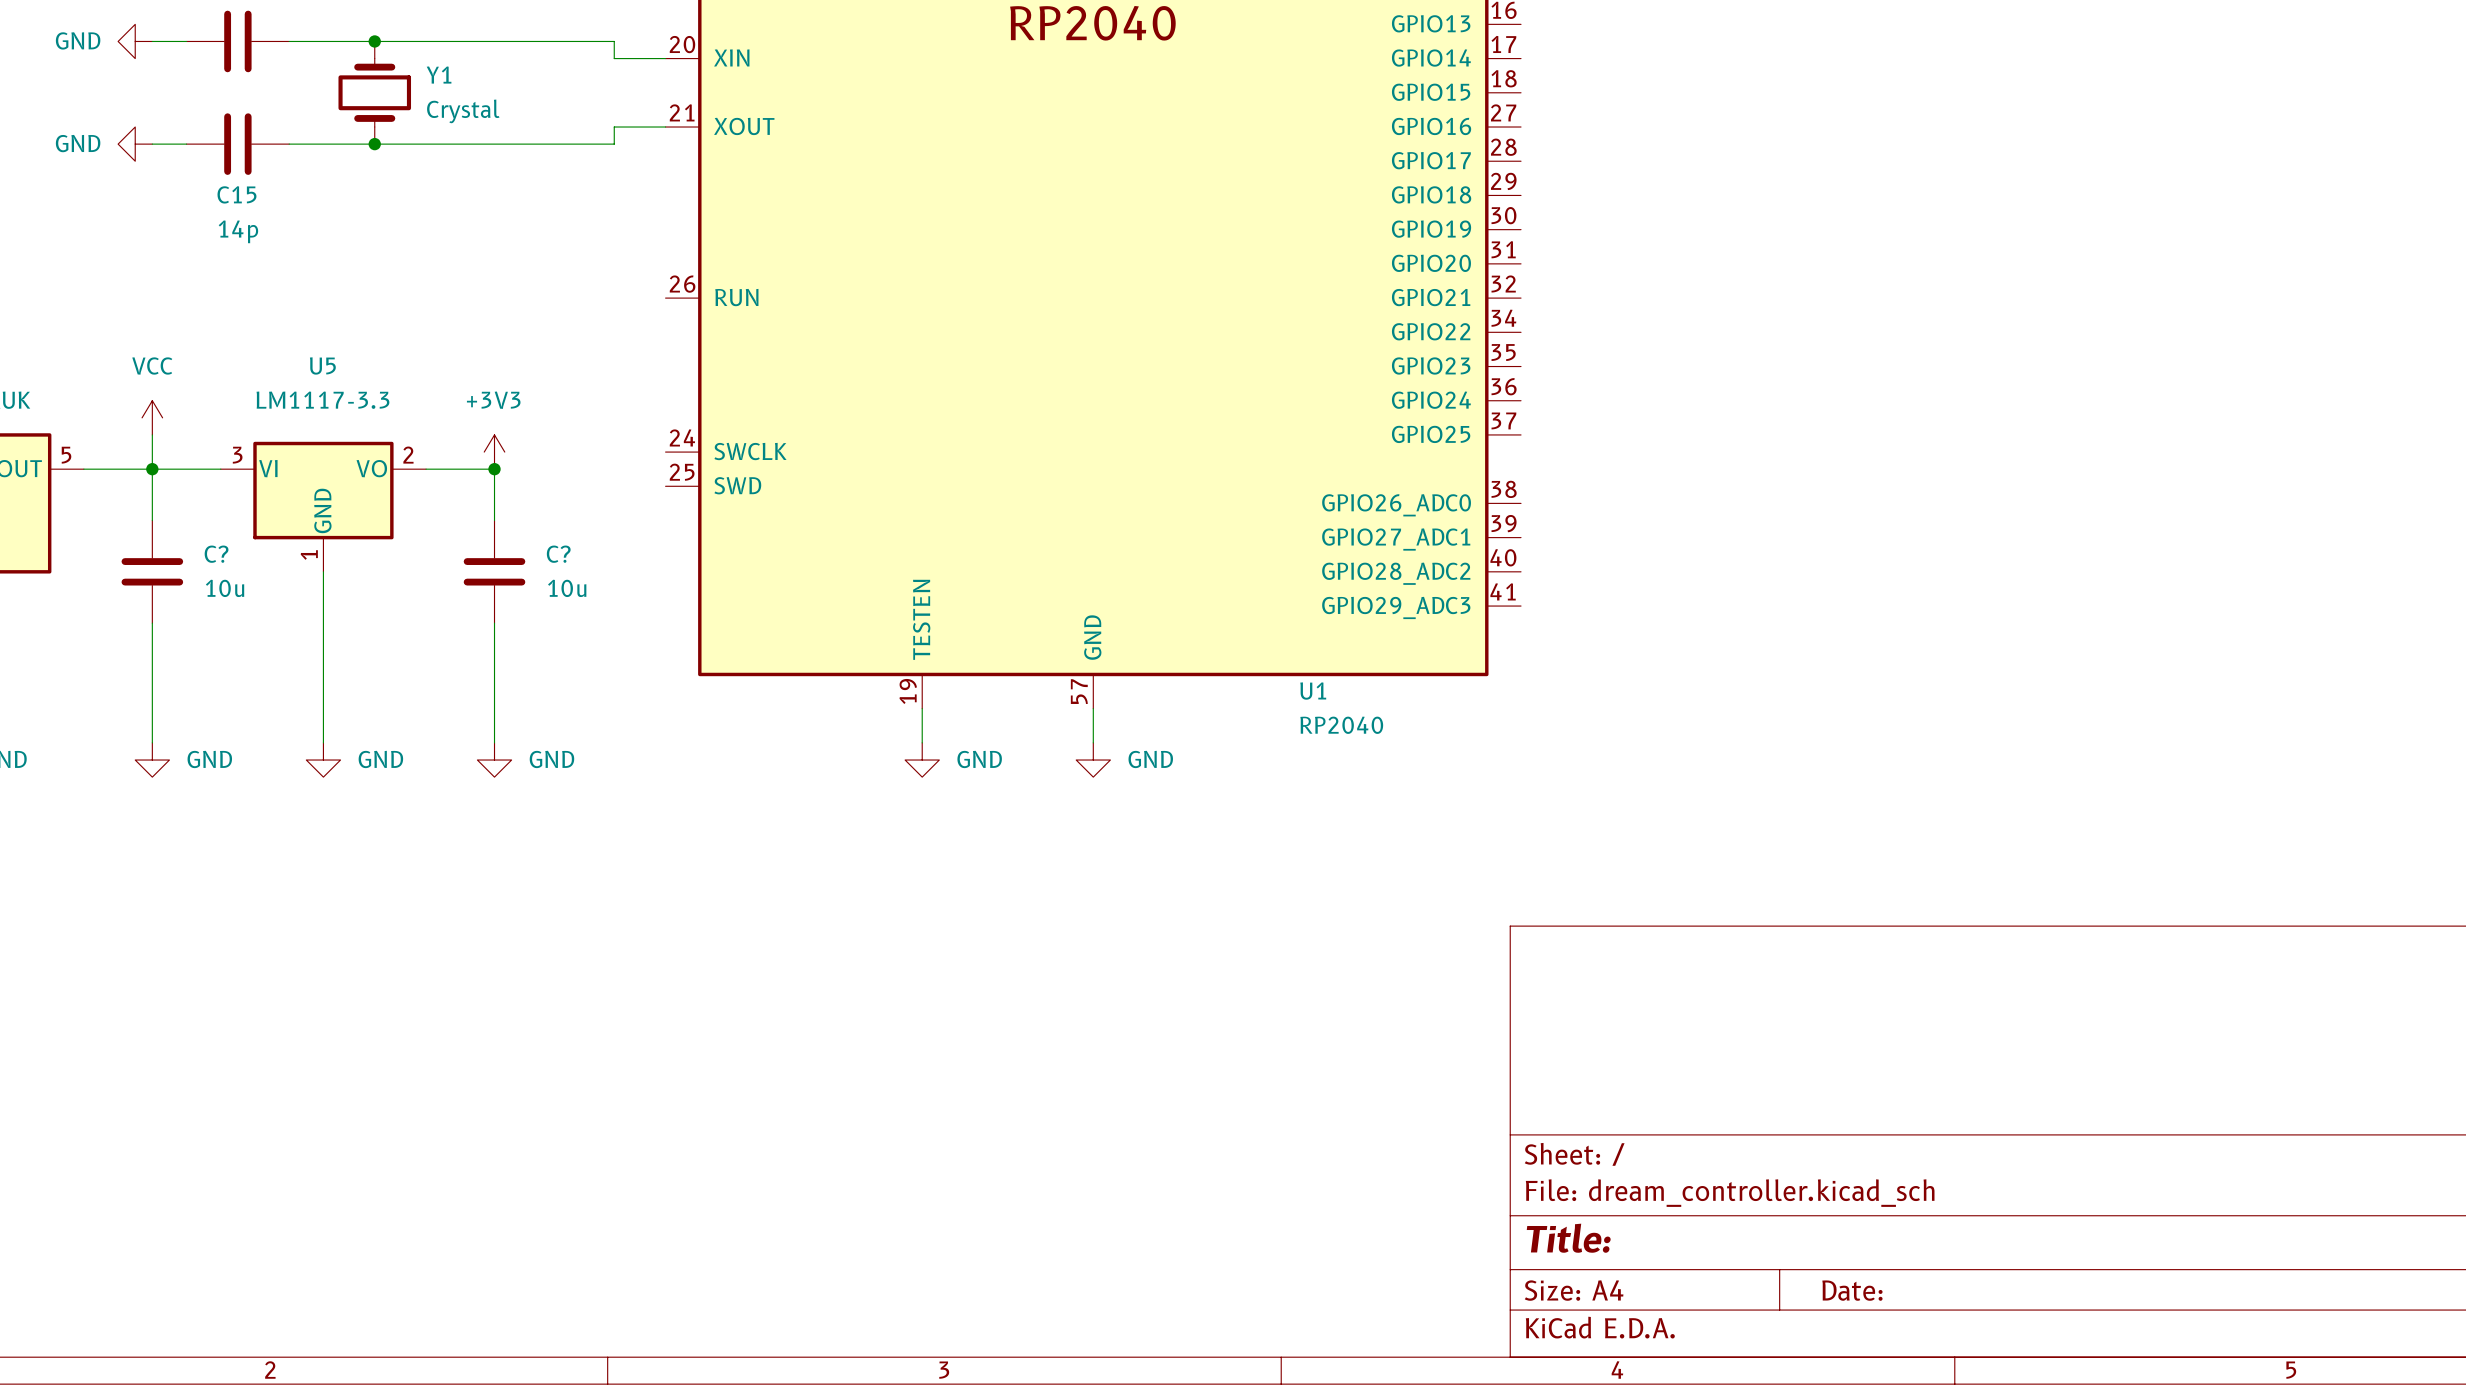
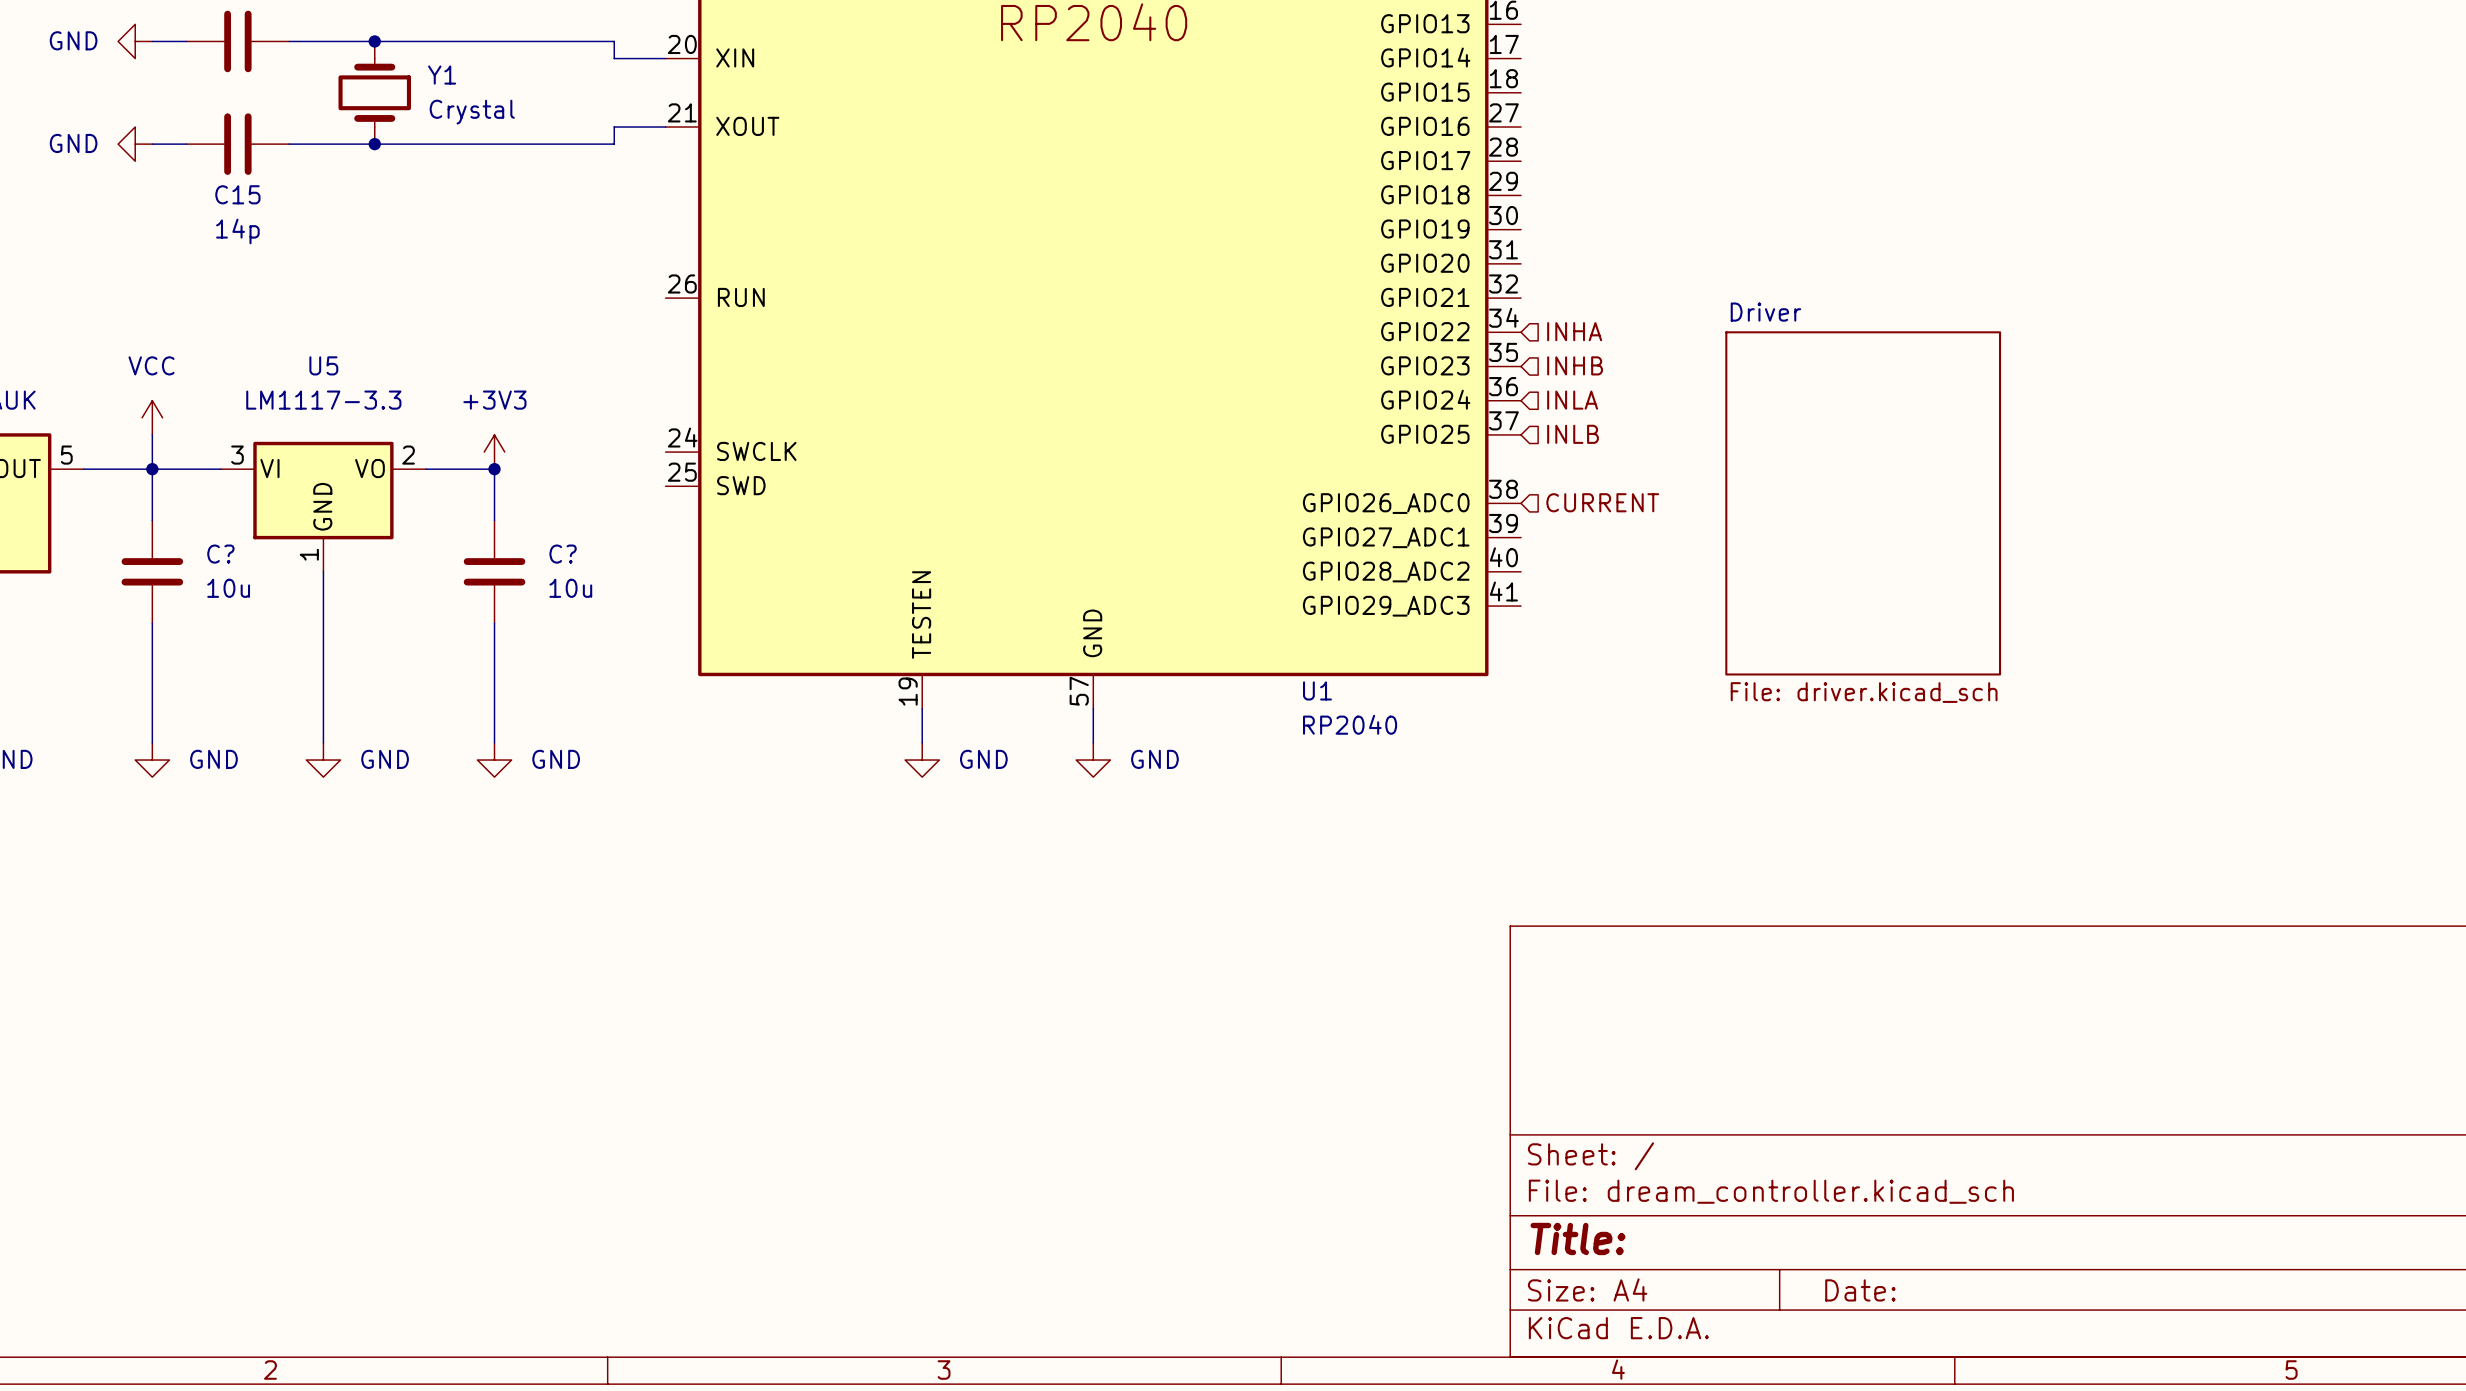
hierarchical label: none -> INHA (1574, 331)
hierarchical label: none -> INHB (1575, 365)
hierarchical label: none -> INLA (1572, 400)
hierarchical label: none -> INLB (1573, 434)
hierarchical label: none -> CURRENT (1602, 502)
sheet Driver: none -> File: driver.kicad_sch (1863, 503)

